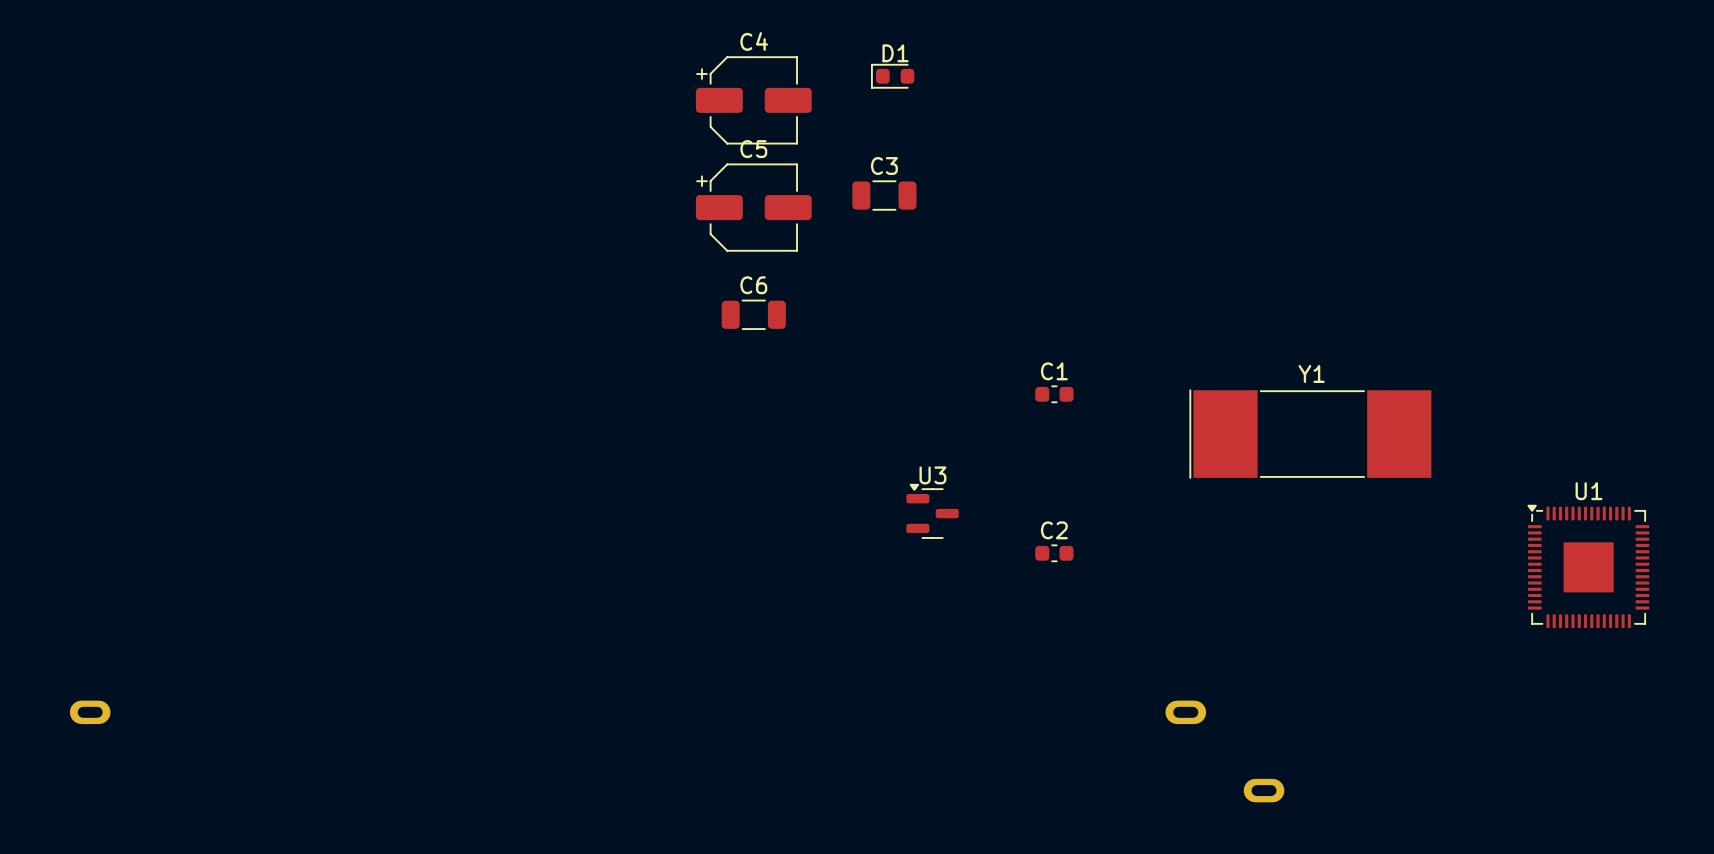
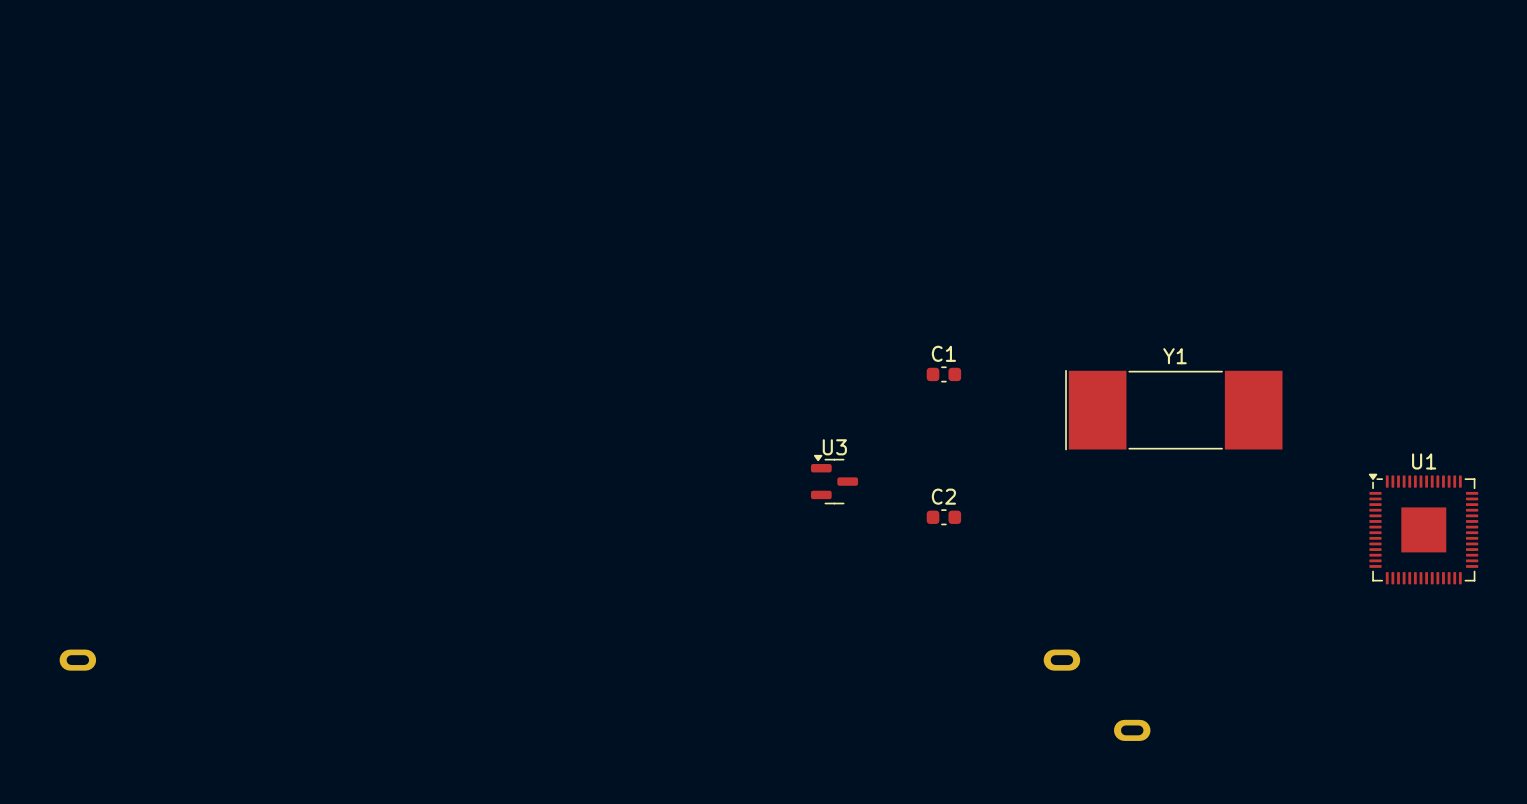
D1: (892, 76) -> none
C4: (753, 100) -> none
C3: (884, 195) -> none
C5: (753, 207) -> none
C6: (753, 314) -> none

